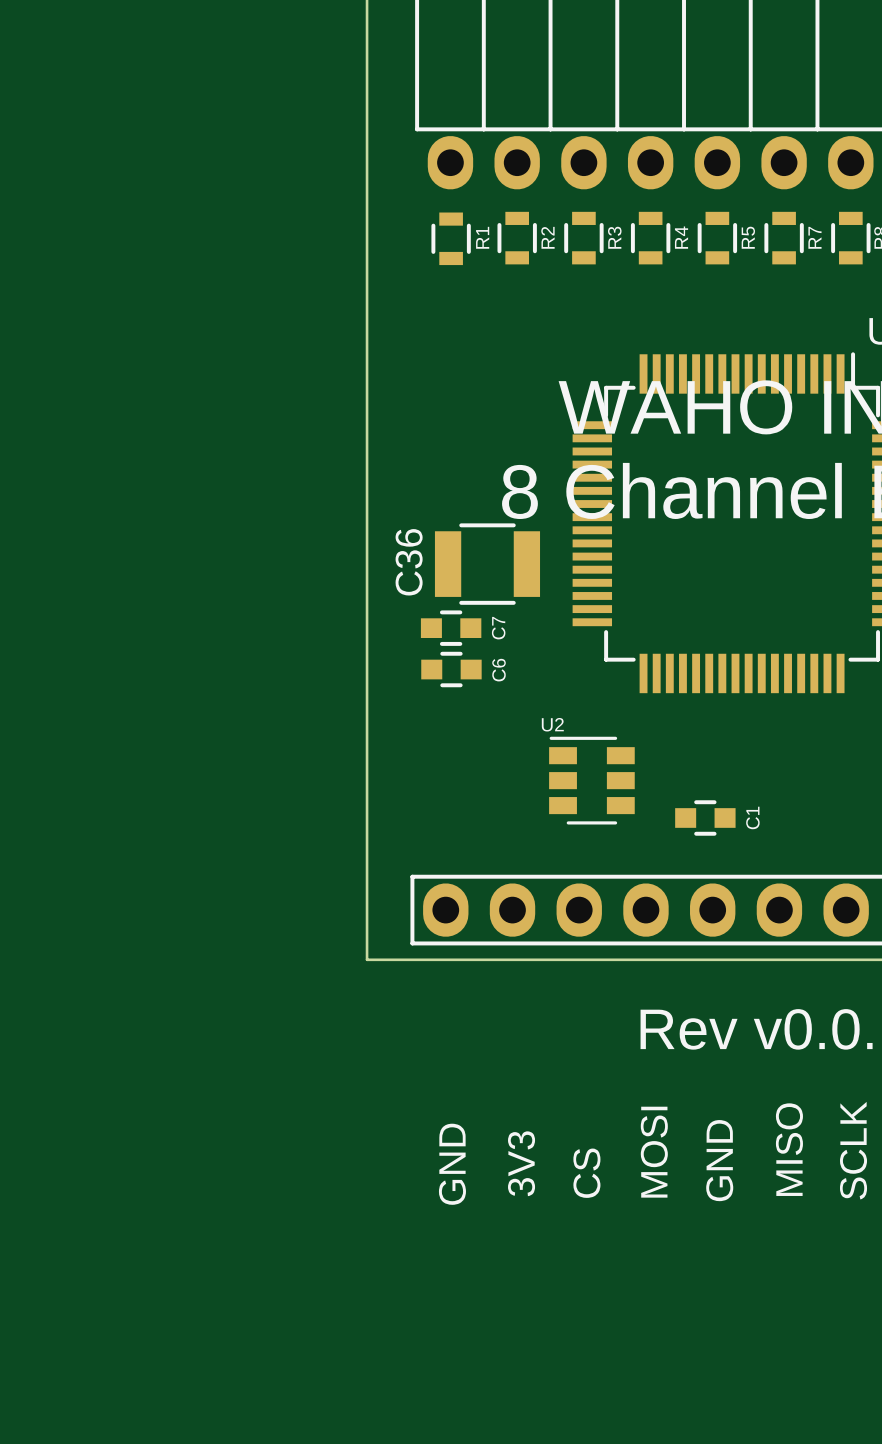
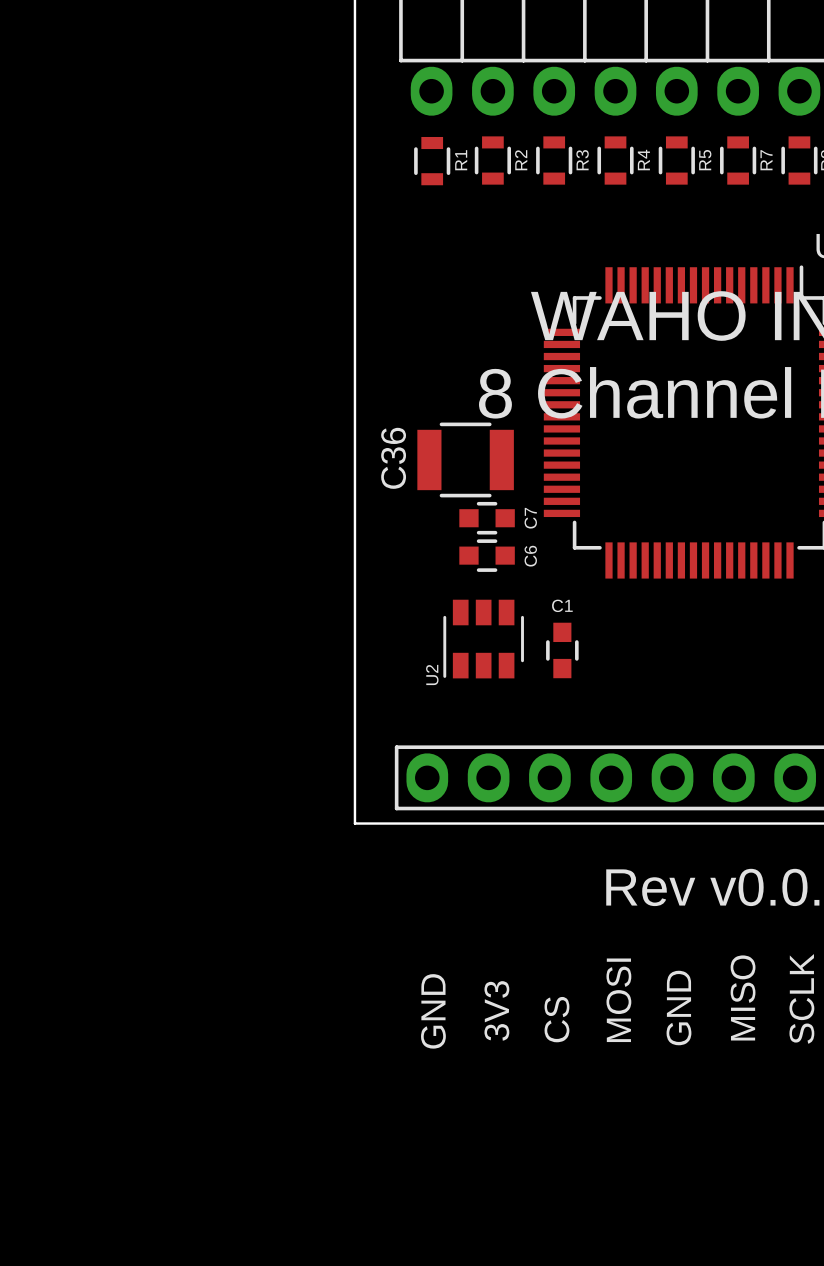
C7 position: (451, 628) -> (487, 518)
C6 position: (451, 669) -> (487, 555)
U2 rotation: 0° (591, 780) -> 90° counterclockwise (483, 639)
U2 position: (591, 780) -> (483, 639)
C1 rotation: 0° (705, 817) -> 90° clockwise (562, 650)
C1 position: (705, 817) -> (562, 650)
C1 name position: C1 (752, 817) -> C1 (562, 605)

